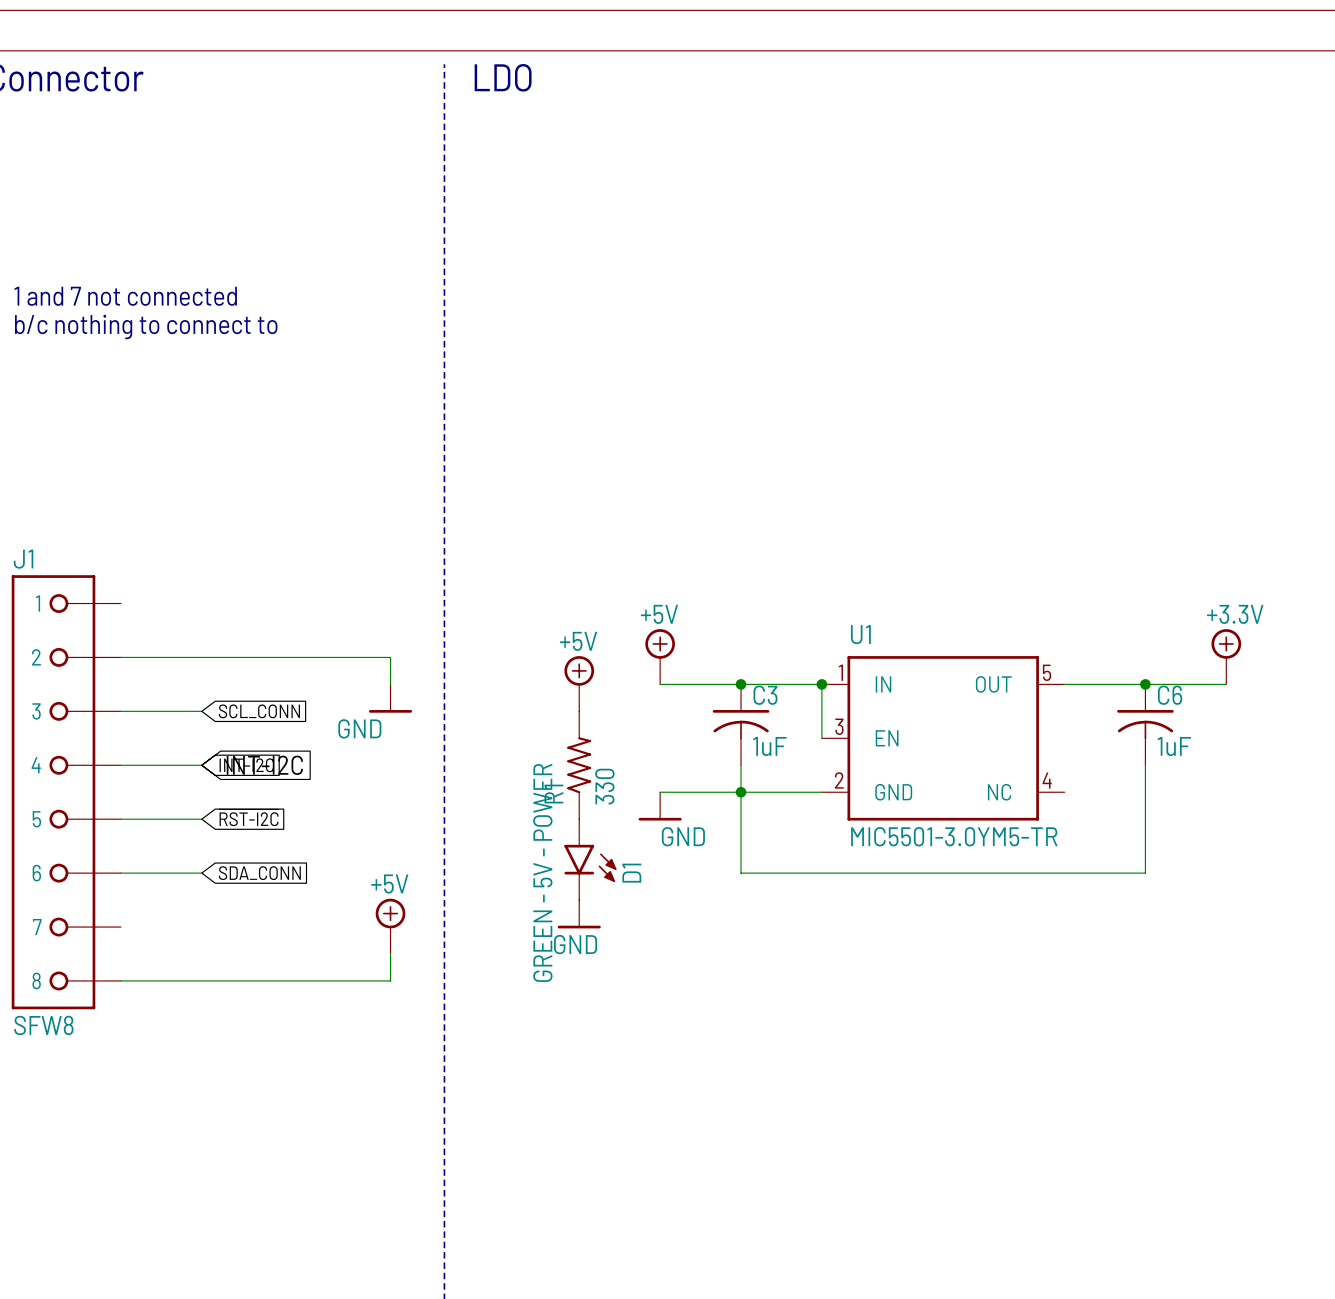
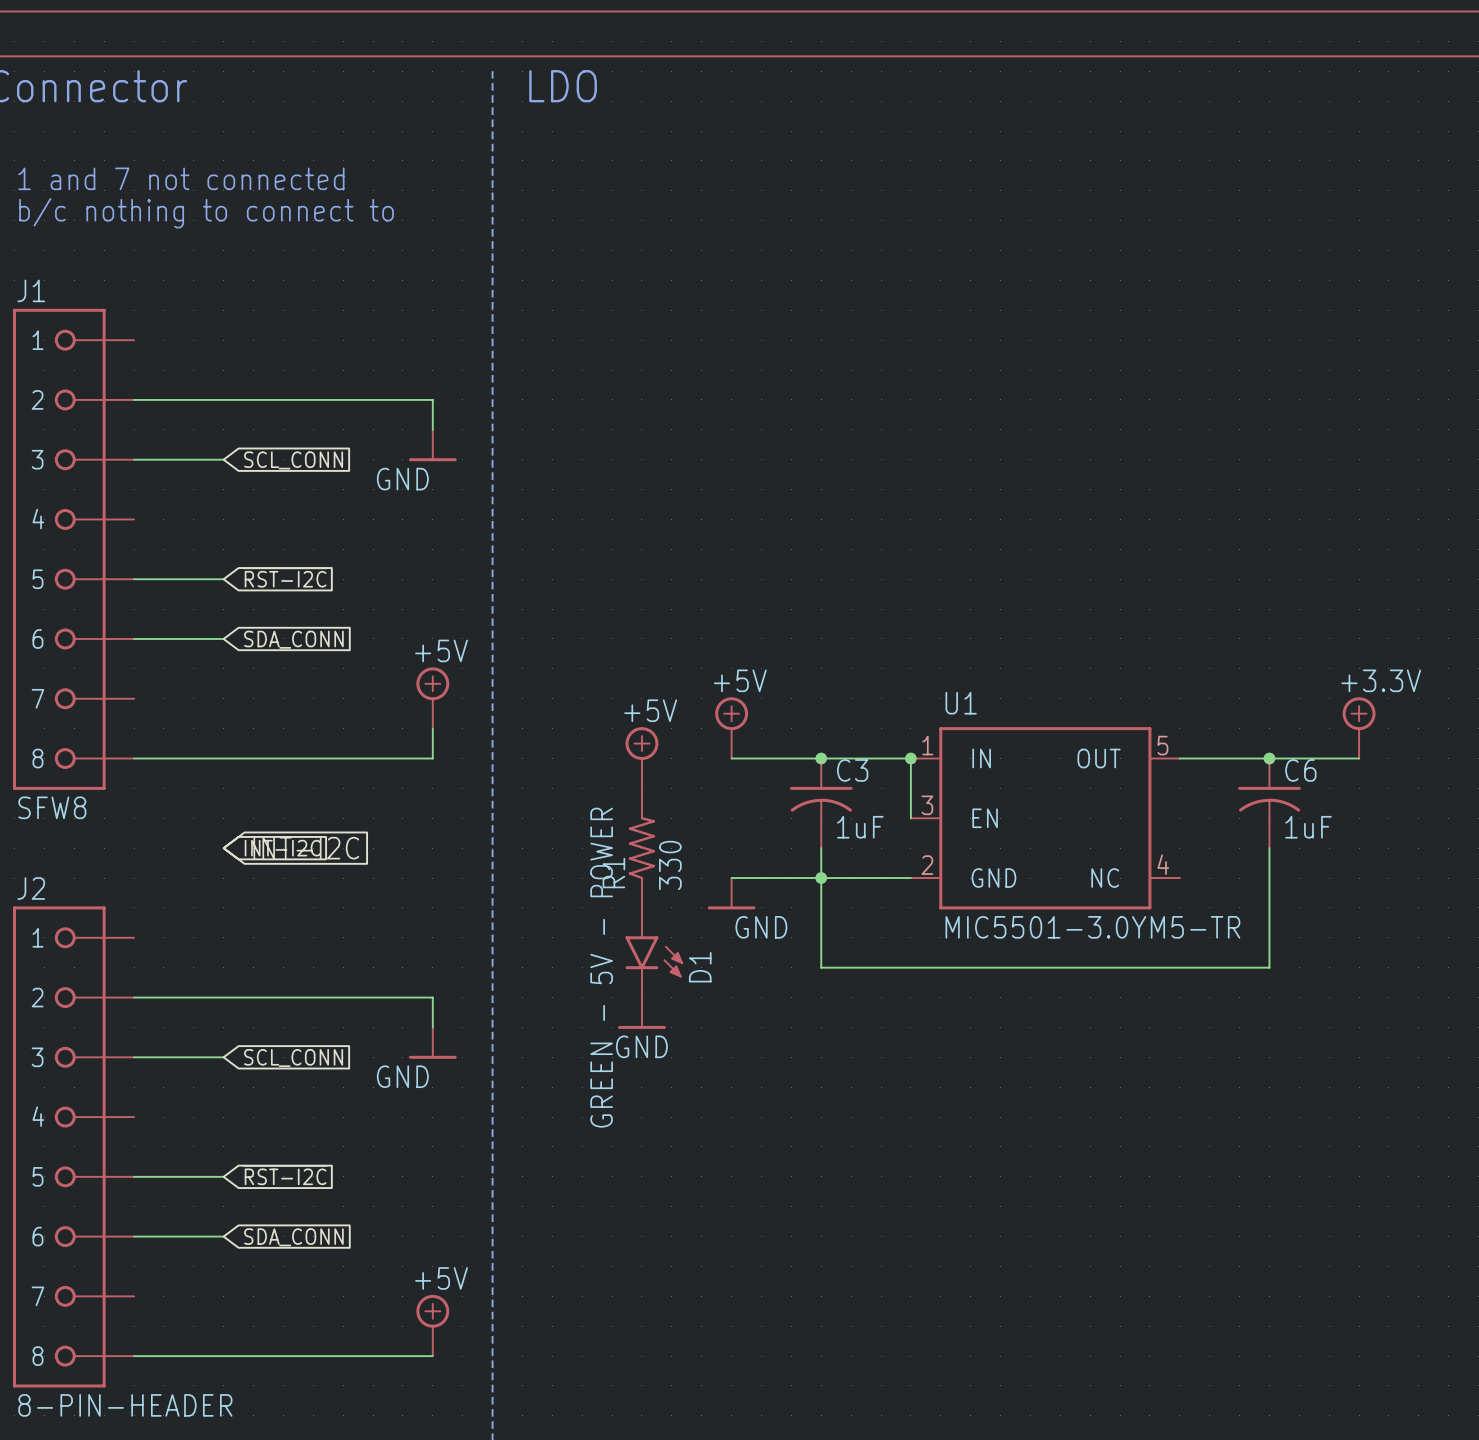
text position: 1 and 7 not connected (125, 296) -> 1 and 7 not connected (181, 178)
text position: b/c nothing to connect to (146, 327) -> b/c nothing to connect to (206, 213)
wire: none -> (134, 399) (432, 399) (432, 429)
power symbol: none -> GND (432, 445)
wire: none -> (134, 459) (223, 459)
global label: none -> SCL_CONN (293, 460)
global label: none -> ~{RST-I2C} (285, 577)
wire: none -> (134, 579) (223, 579)
global label: none -> SDA_CONN (293, 639)
power symbol: none -> +5V (432, 698)
wire: (120, 657) (390, 657) -> (134, 758) (432, 758)
power symbol: GND (390, 698) -> none
wire: (120, 711) (201, 711) -> (134, 1057) (223, 1057)
global label: SCL_CONN (259, 711) -> none
wire: (120, 765) (201, 765) -> (134, 638) (223, 638)
J1 position: (66, 792) -> (73, 549)
global label: ~{RST-I2C} (248, 817) -> none
wire: (120, 819) (201, 819) -> (134, 1176) (223, 1176)
wire: (120, 873) (201, 873) -> (134, 1236) (223, 1236)
global label: SDA_CONN (259, 873) -> none
wire: none -> (134, 997) (432, 997) (432, 1027)
power symbol: +5V (390, 926) -> none
power symbol: none -> GND (432, 1043)
global label: none -> SCL_CONN (293, 1058)
wire: (390, 954) (390, 980) (120, 980) -> none
J2: none -> 8-PIN-HEADER (73, 1146)
global label: none -> ~{RST-I2C} (285, 1175)
global label: none -> SDA_CONN (293, 1237)
power symbol: none -> +5V (432, 1325)
wire: none -> (134, 1356) (432, 1356)

